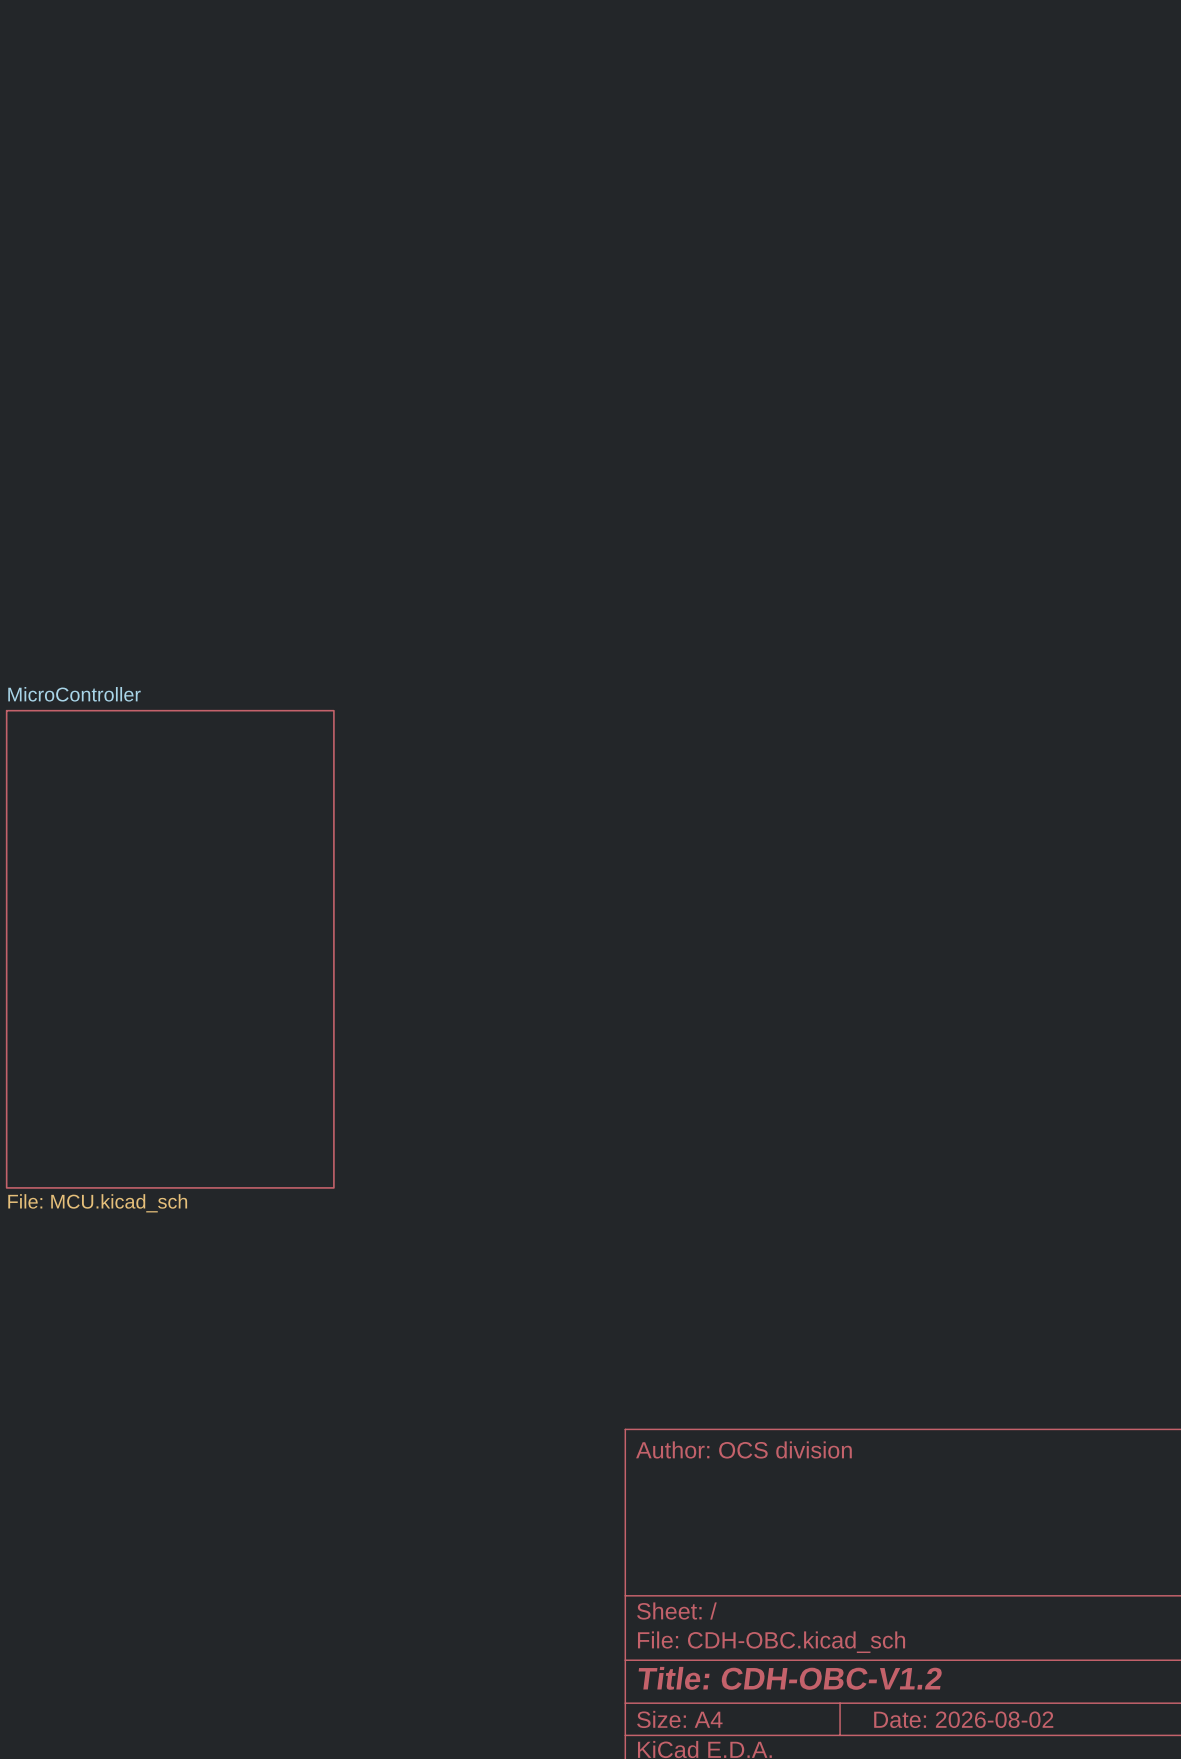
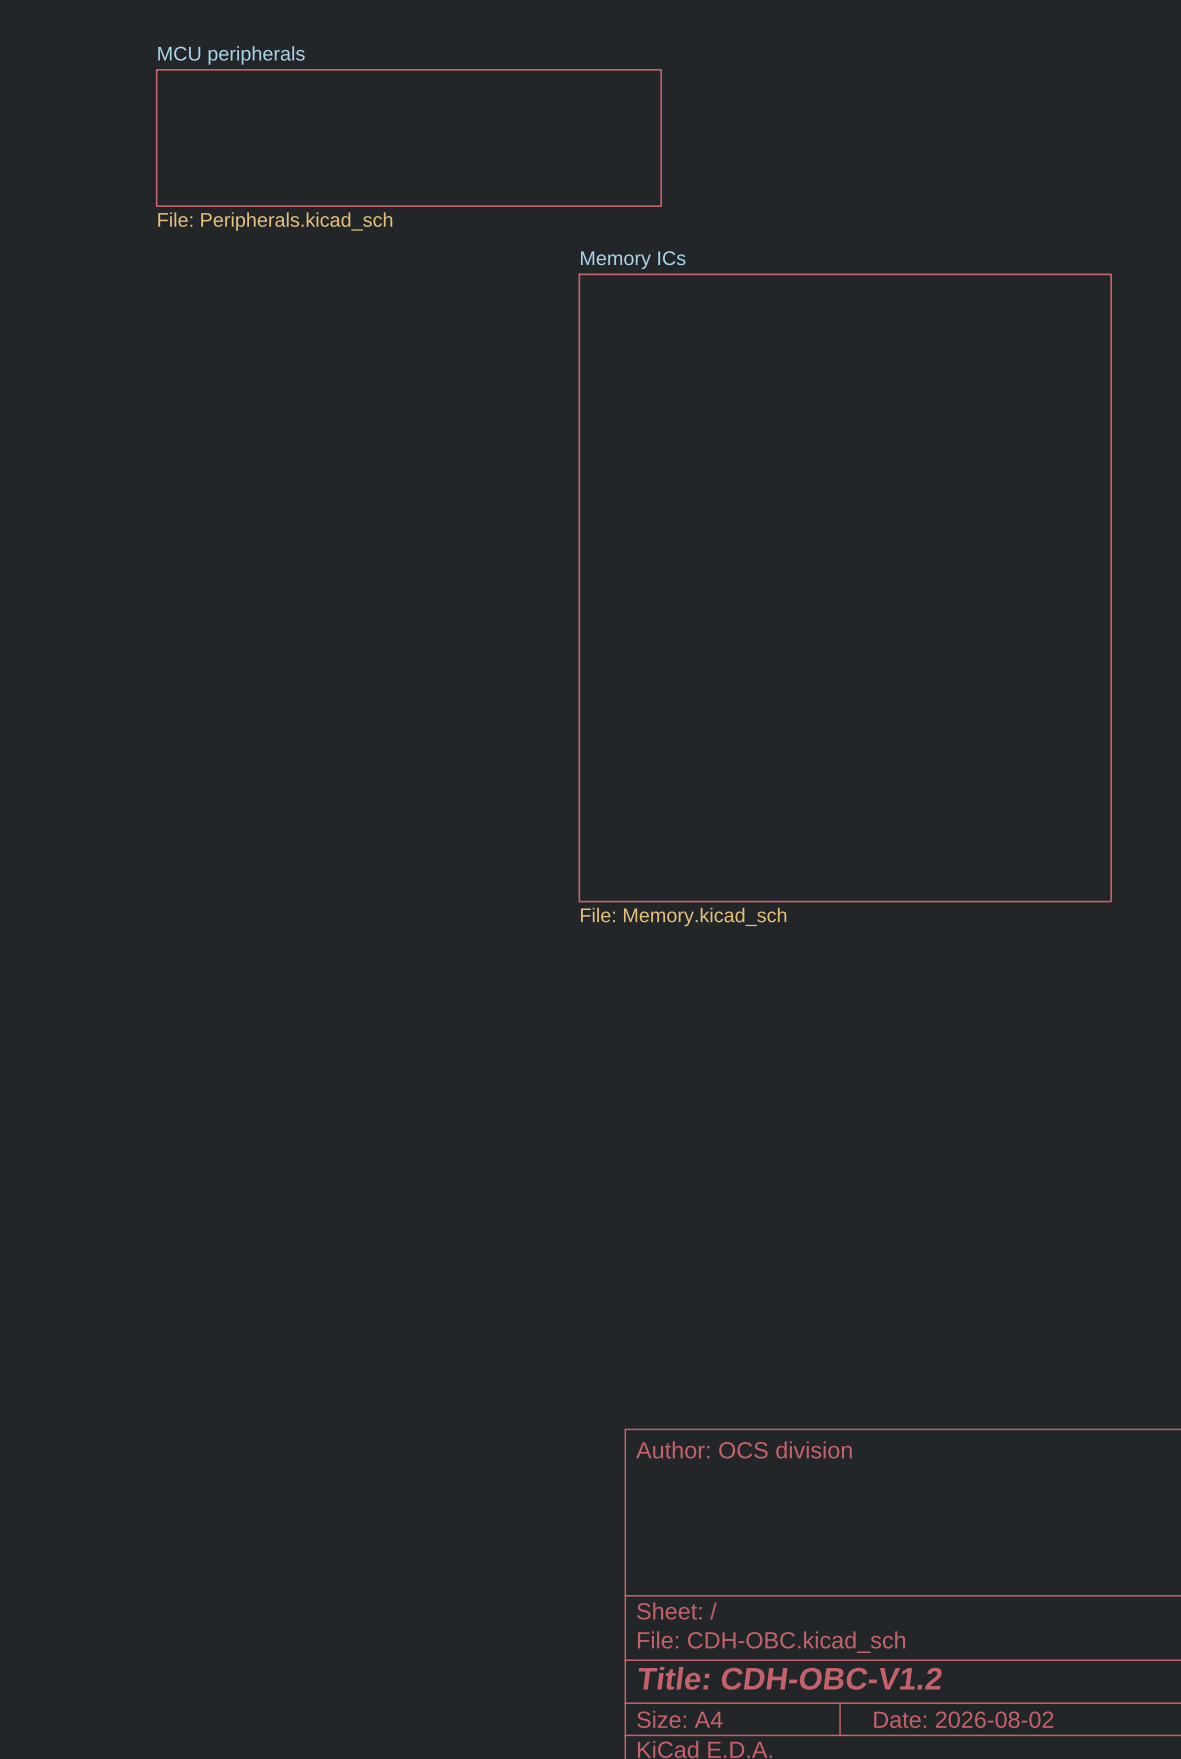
sheet MCU peripherals: none -> File: Peripherals.kicad_sch (408, 137)
sheet Memory ICs: none -> File: Memory.kicad_sch (845, 587)
sheet MicroController: File: MCU.kicad_sch (170, 949) -> none

